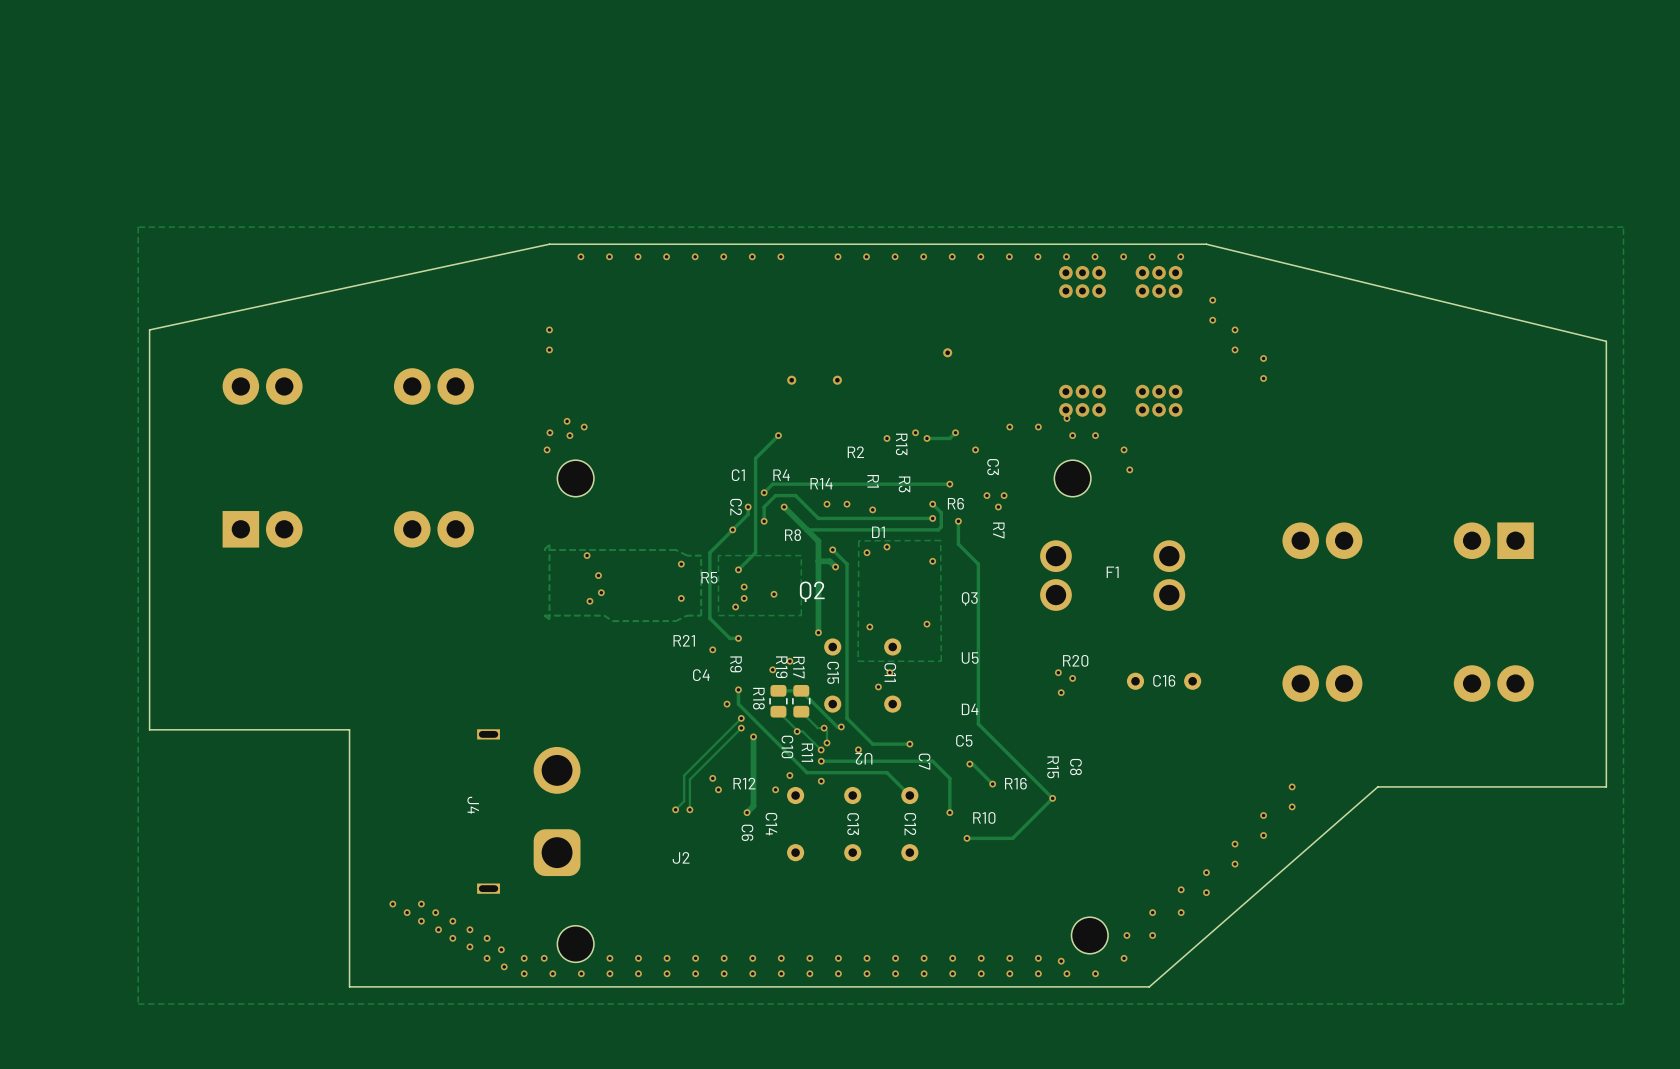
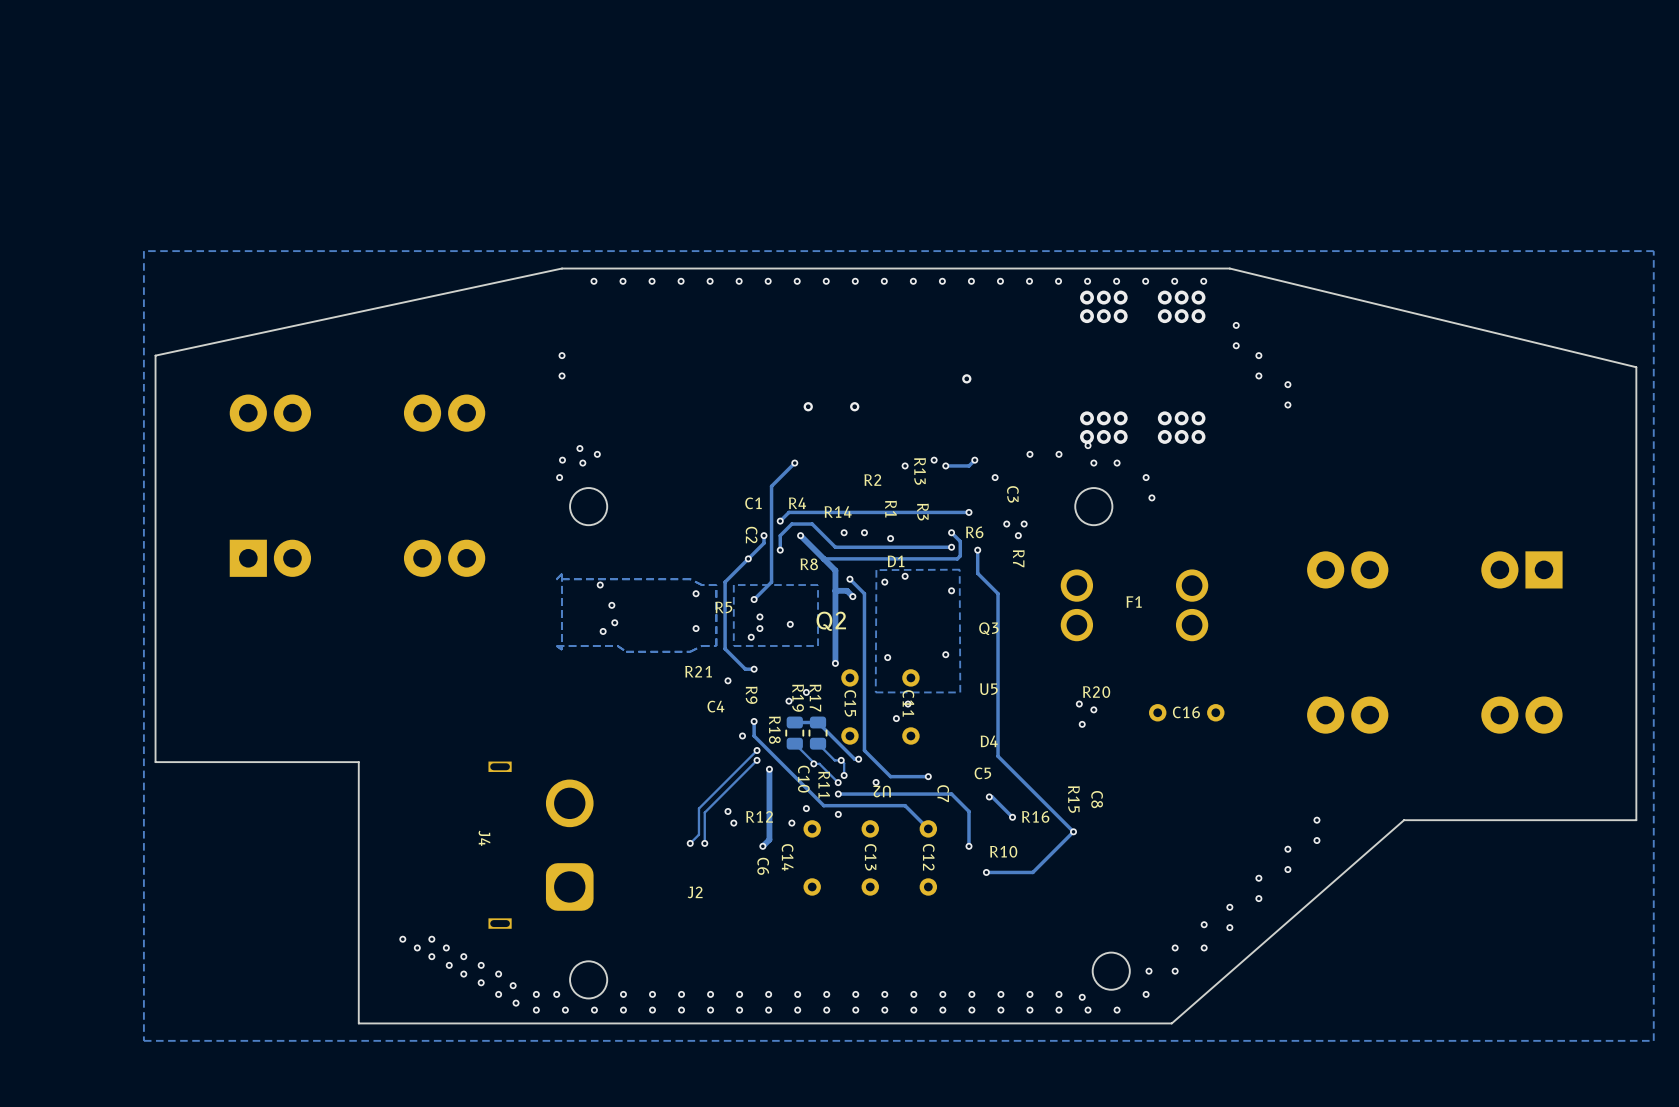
via: none -> (826, 281)

